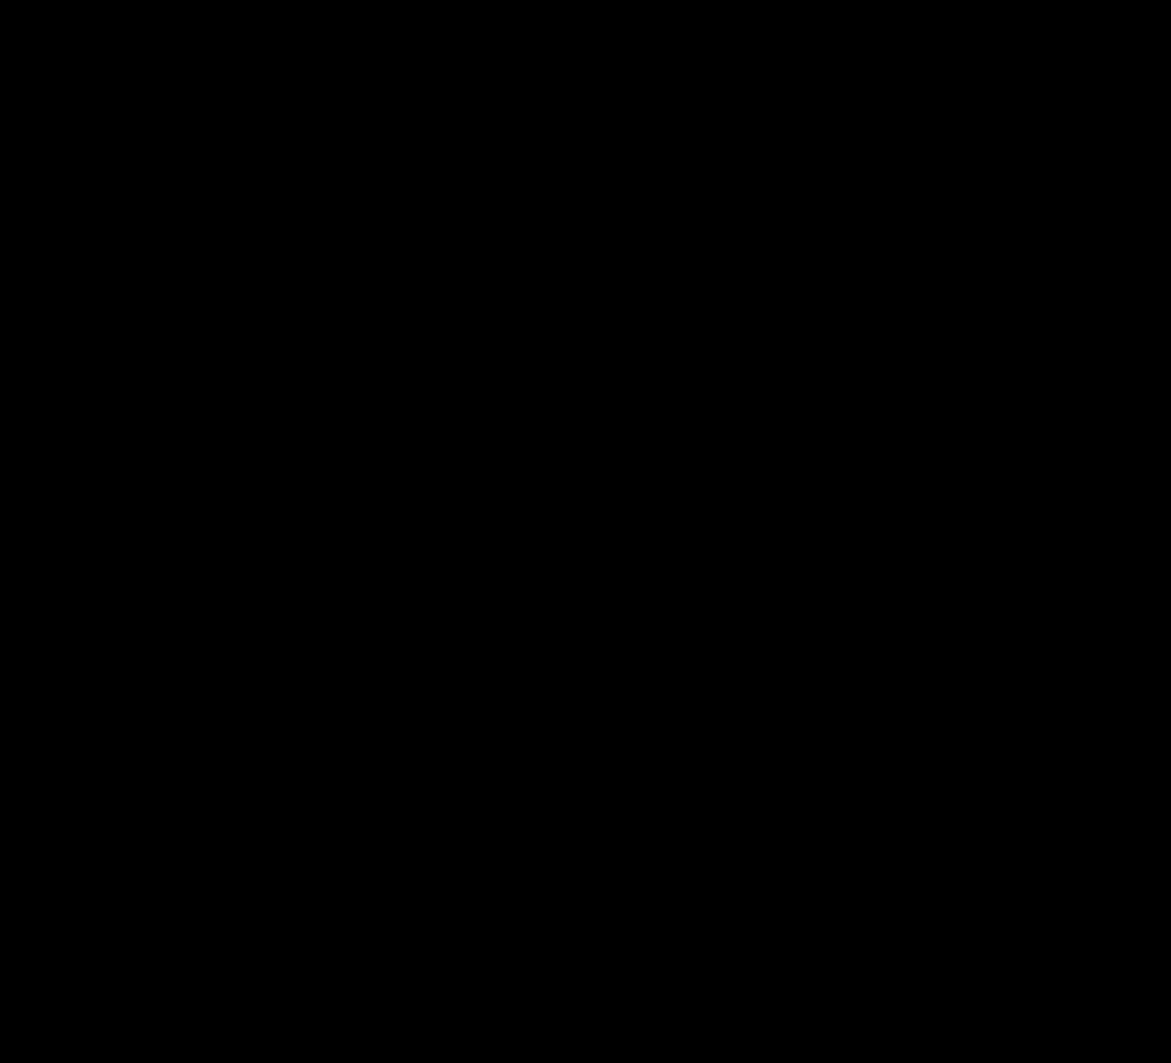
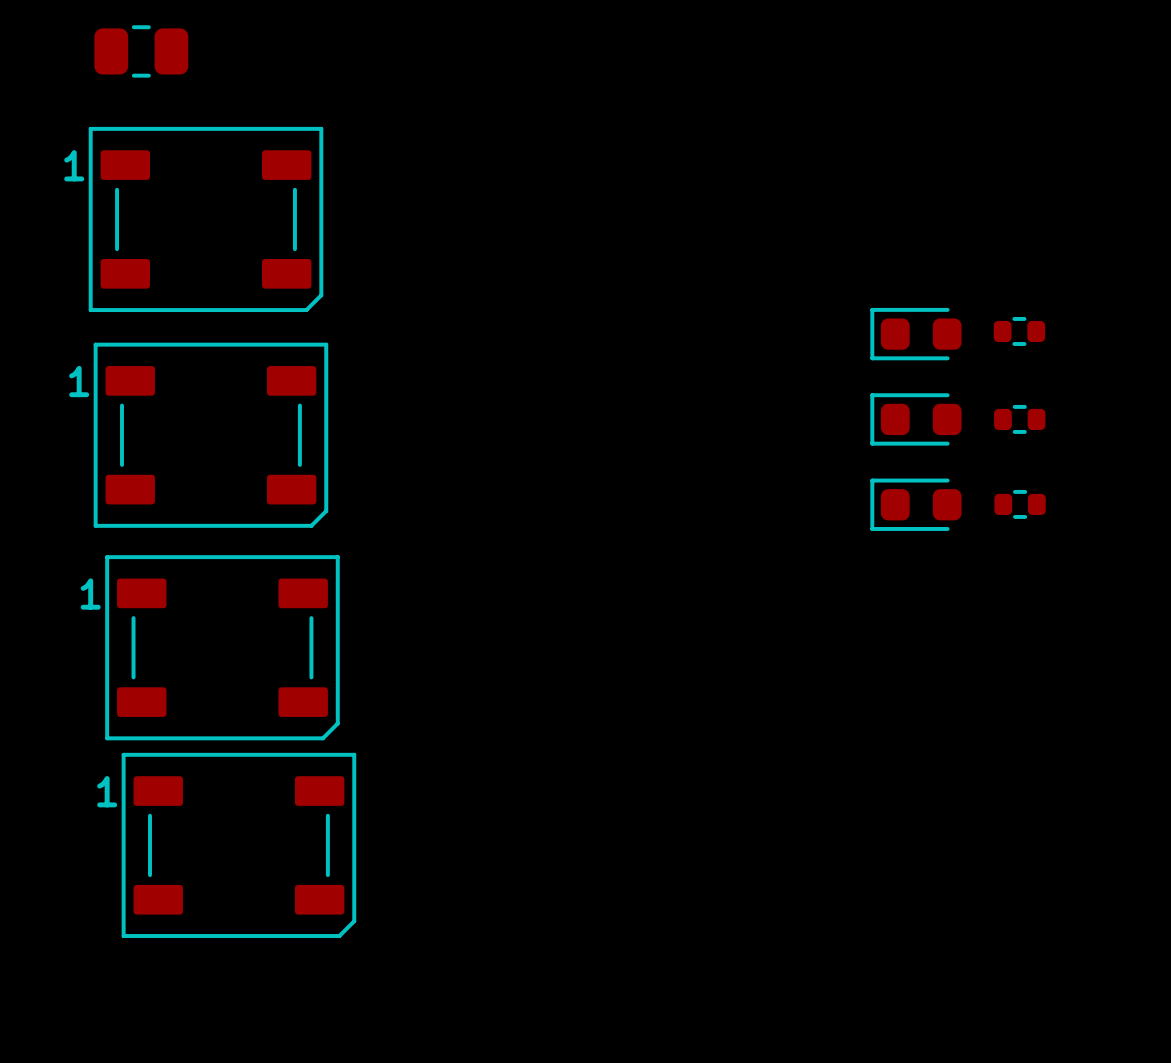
part: none -> (141, 51)
part: none -> (206, 219)
part: none -> (1019, 331)
part: none -> (915, 334)
part: none -> (915, 419)
part: none -> (1019, 419)
part: none -> (210, 435)
part: none -> (915, 504)
part: none -> (1020, 504)
part: none -> (222, 647)
part: none -> (238, 845)

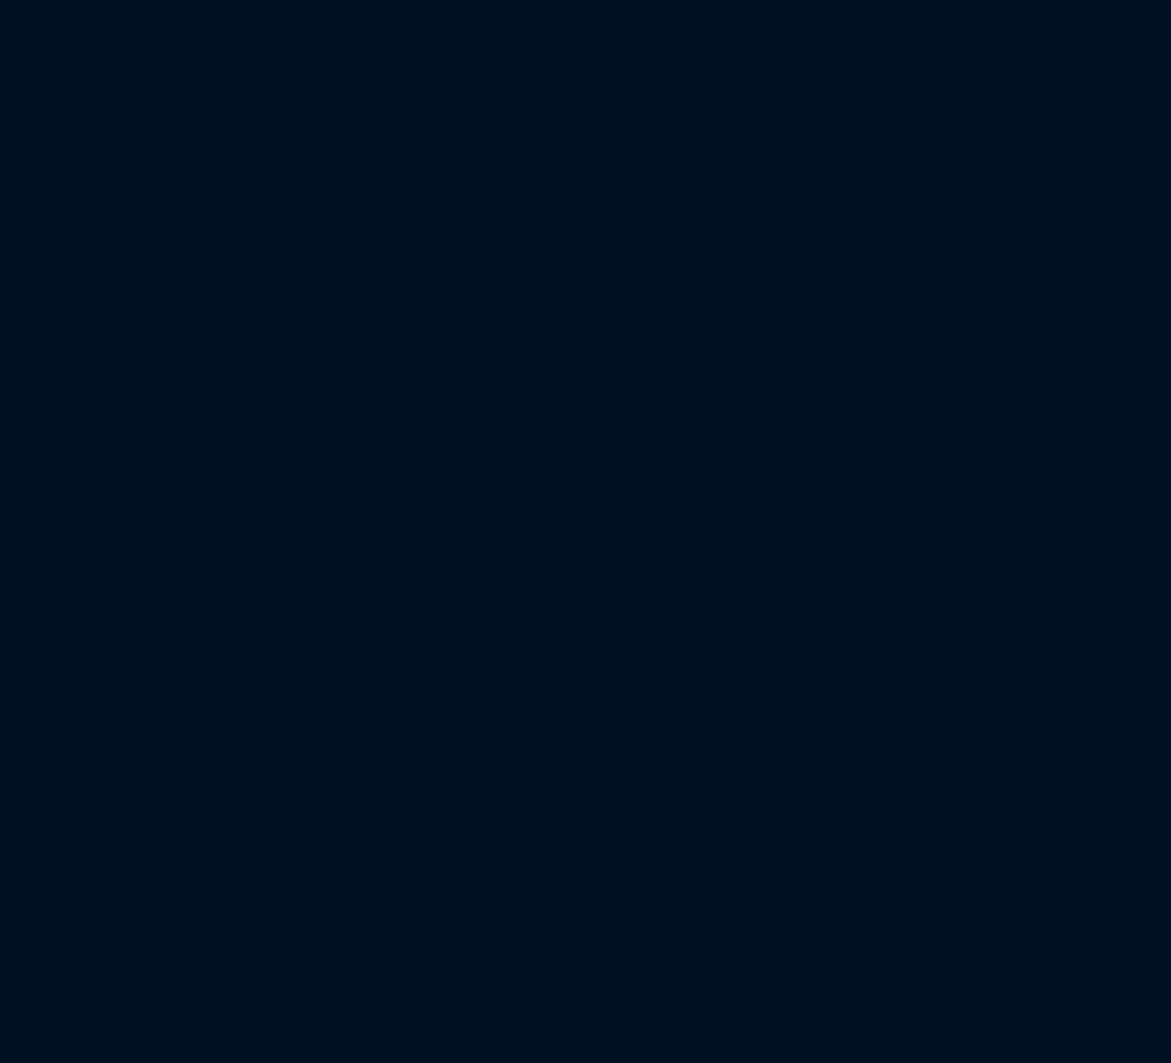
part: (141, 51) -> none
part: (206, 219) -> none
part: (1019, 331) -> none
part: (915, 334) -> none
part: (915, 419) -> none
part: (1019, 419) -> none
part: (210, 435) -> none
part: (915, 504) -> none
part: (1020, 504) -> none
part: (222, 647) -> none
part: (238, 845) -> none

